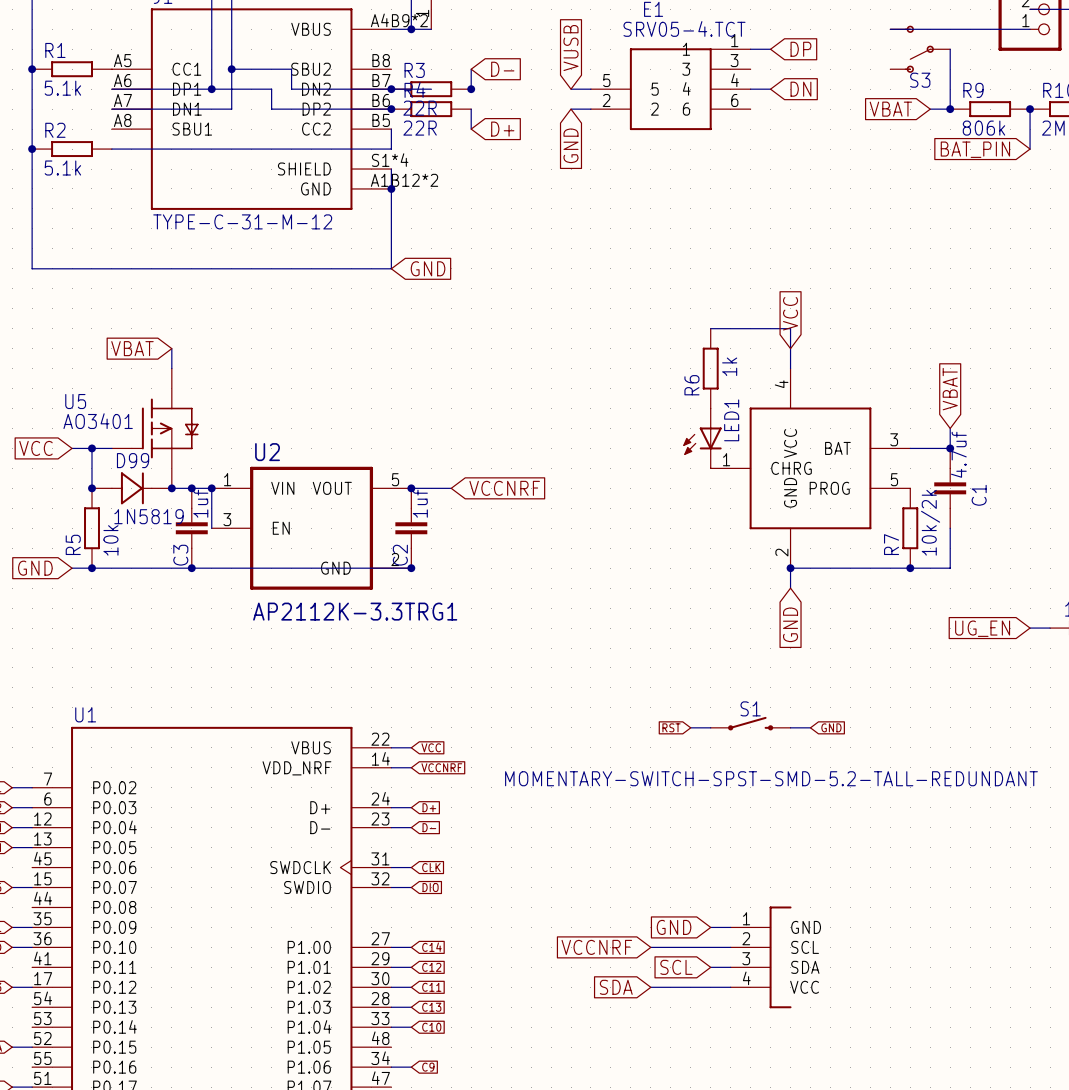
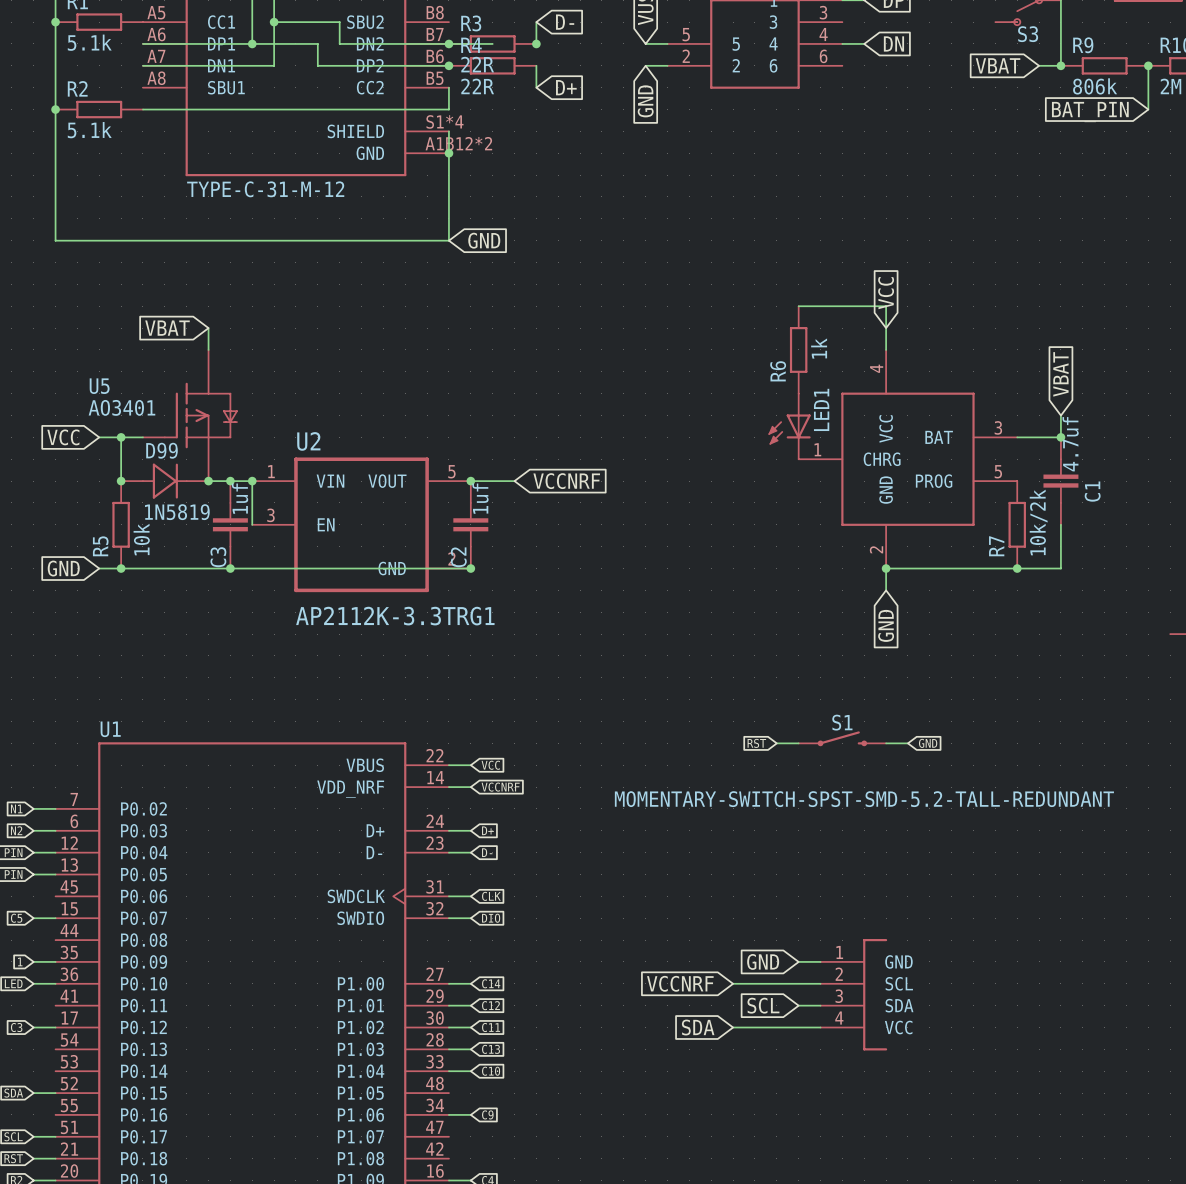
global label: UG_EN (982, 628) -> none
wire: (1030, 628) (1050, 628) -> none

